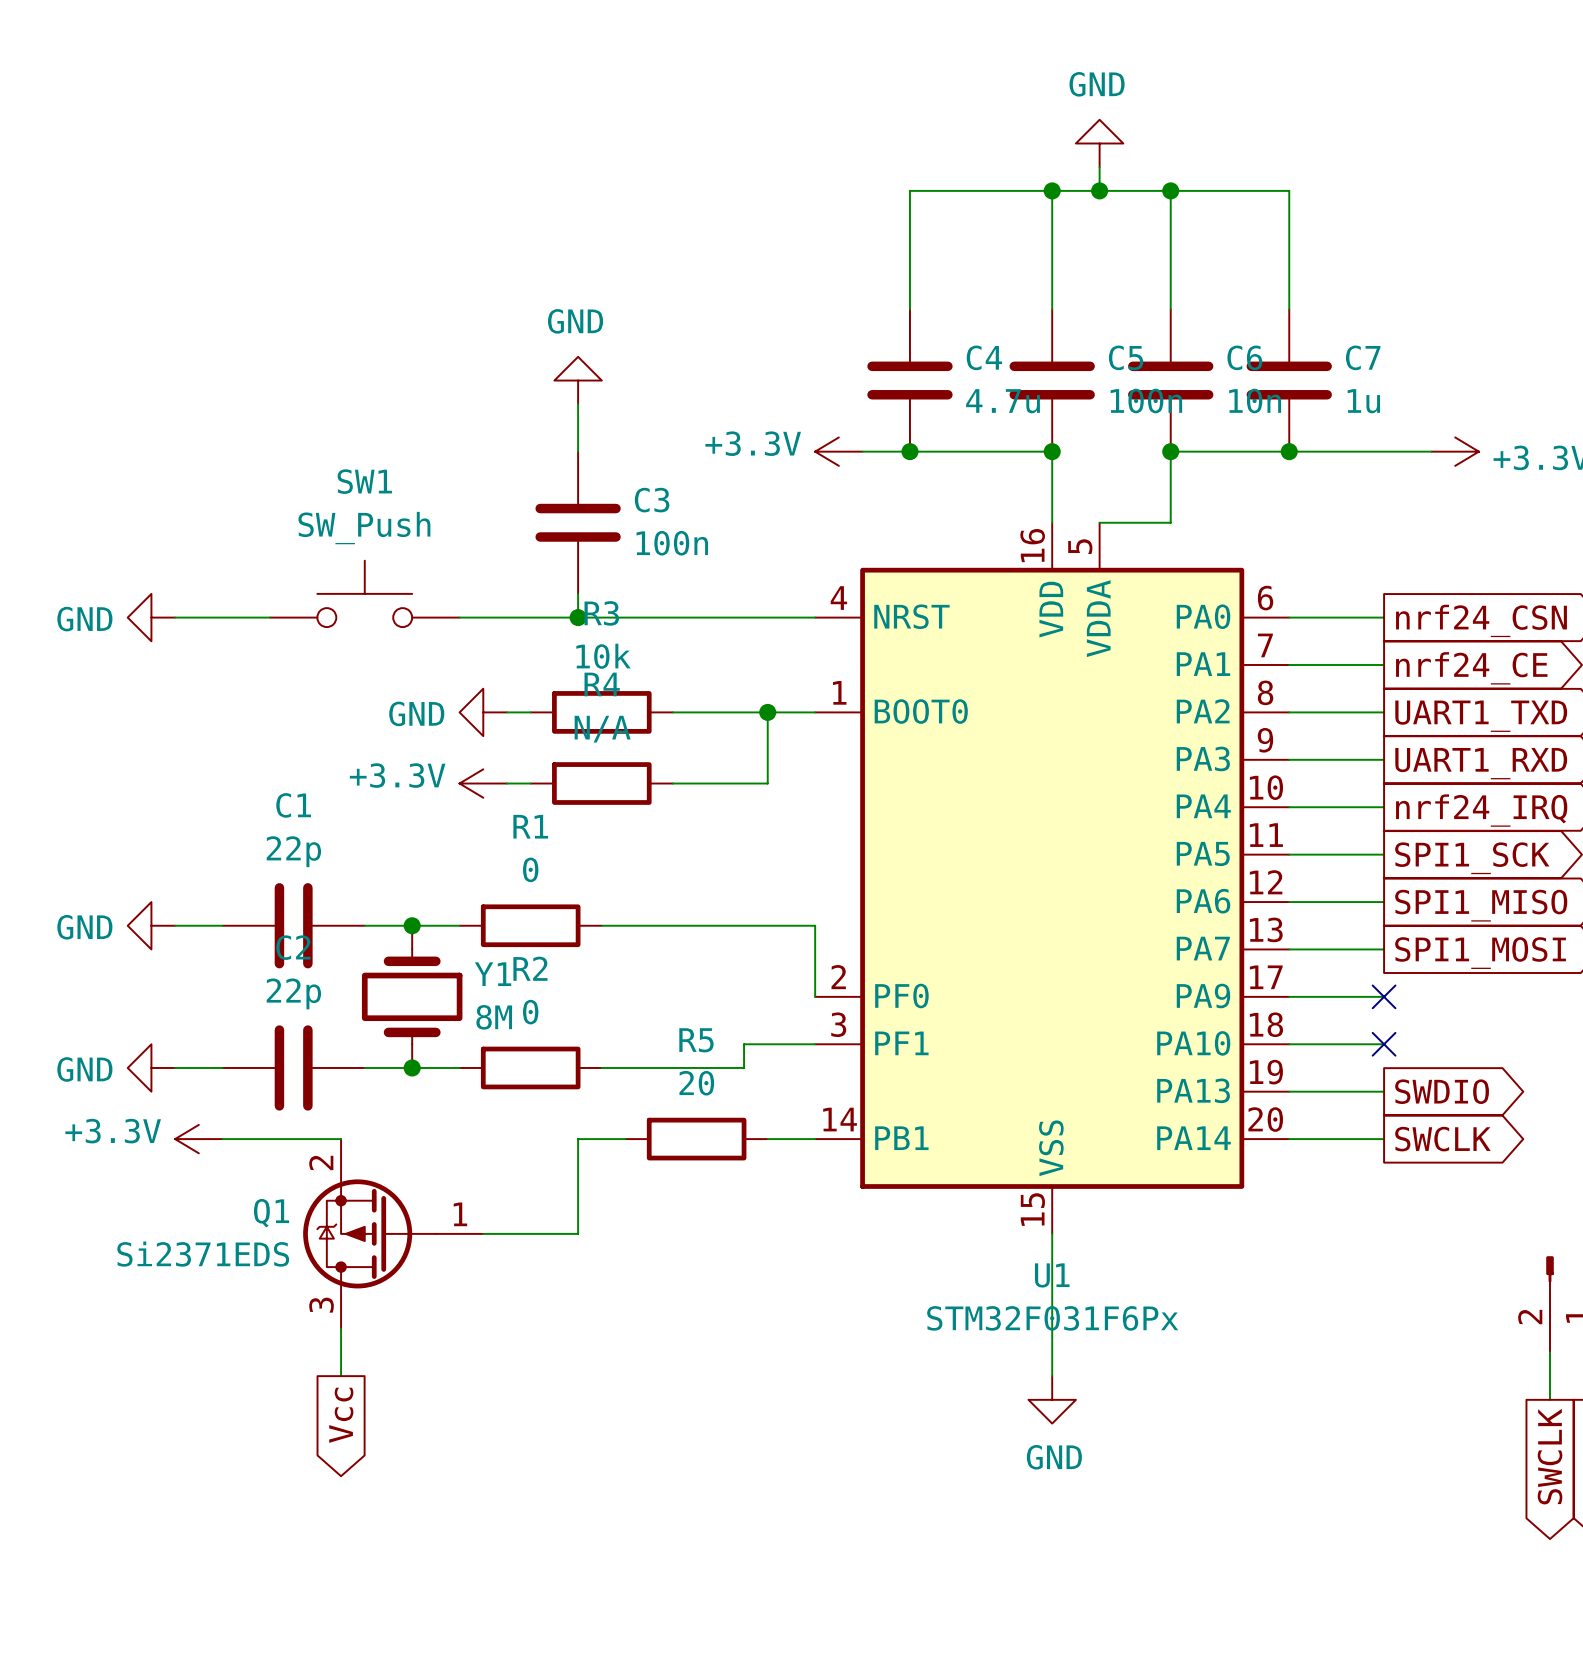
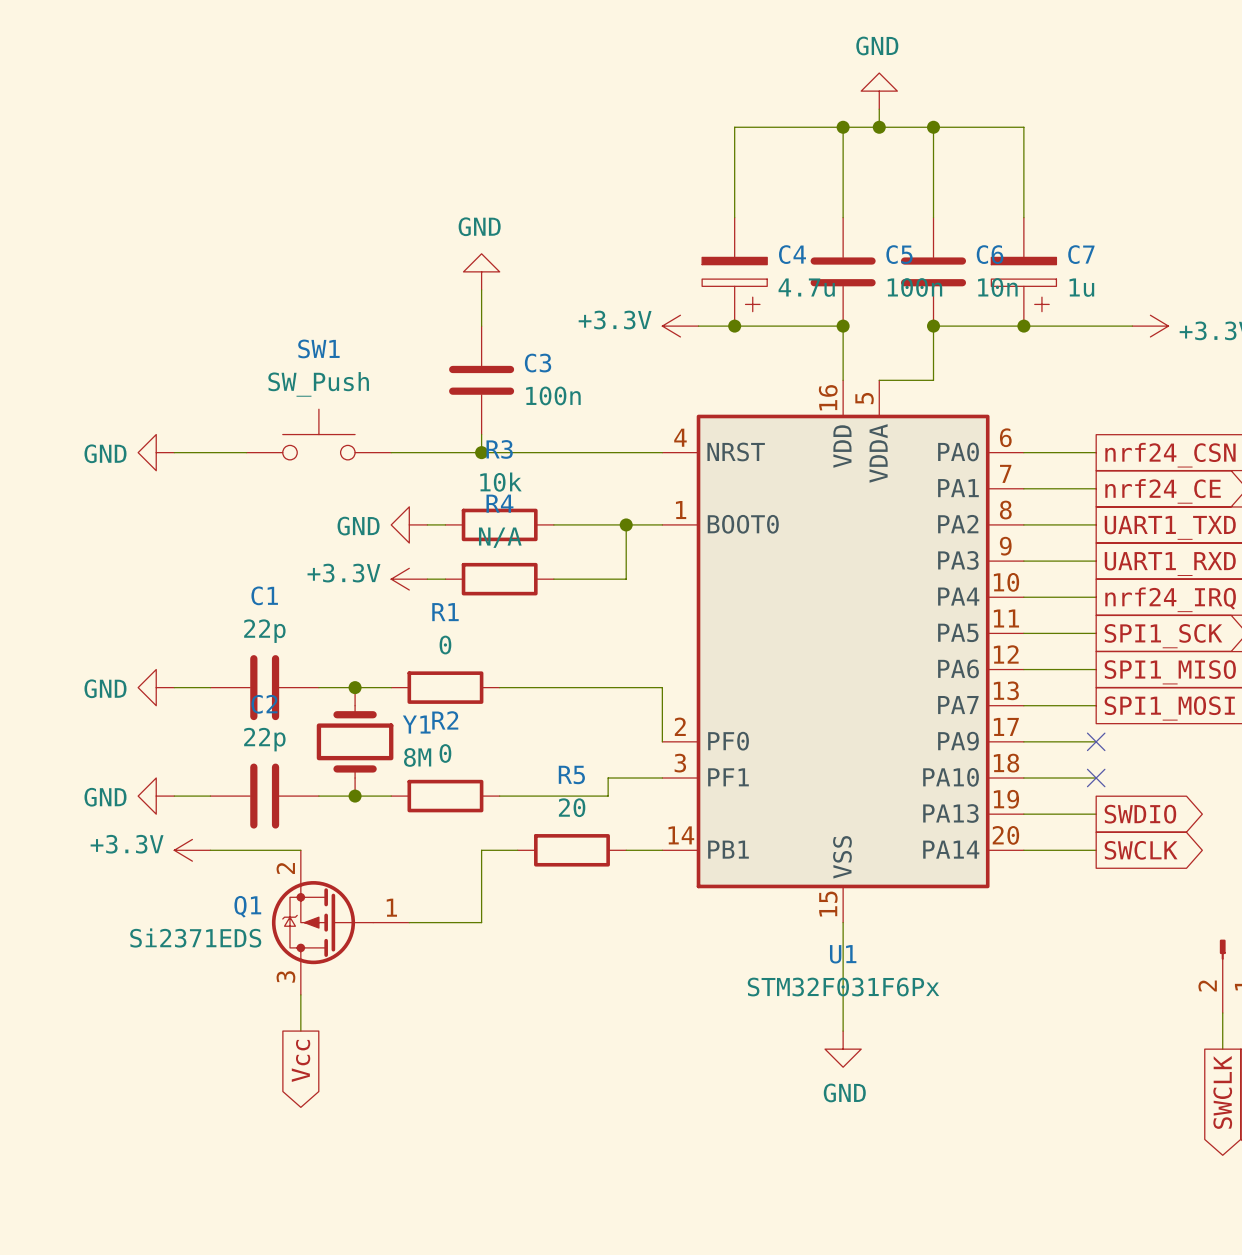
C4 symbol: [867, 309, 953, 452] -> [702, 217, 768, 327]
C7 symbol: [1246, 309, 1332, 452] -> [991, 217, 1057, 327]

